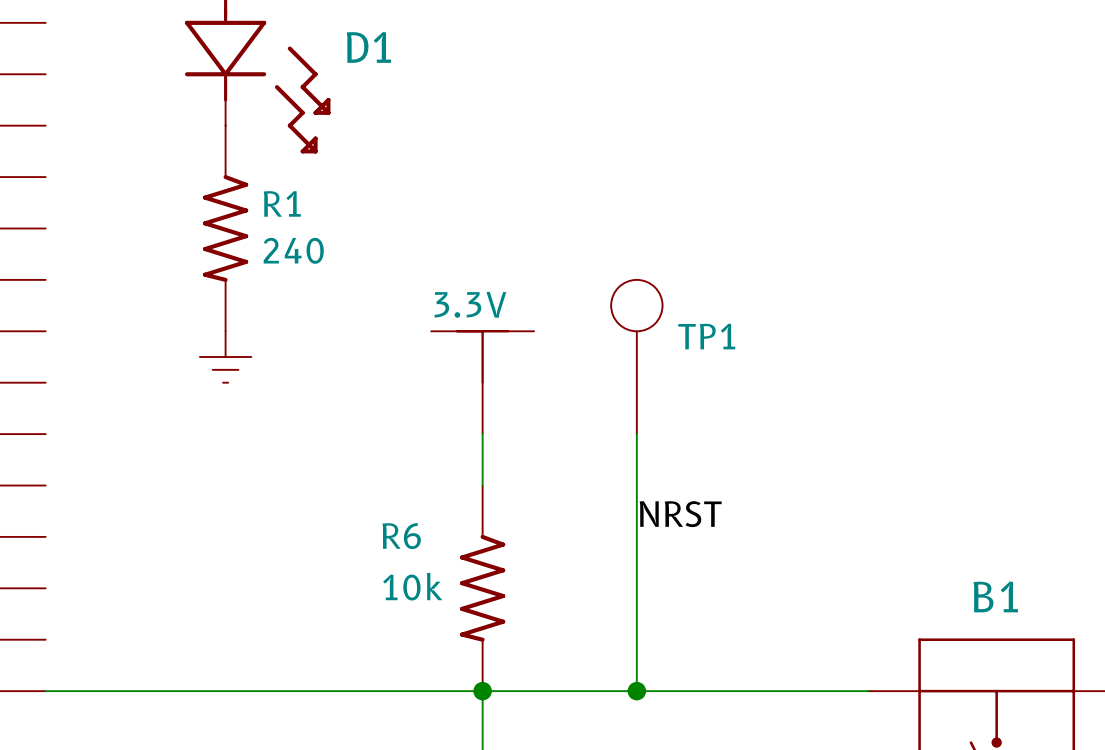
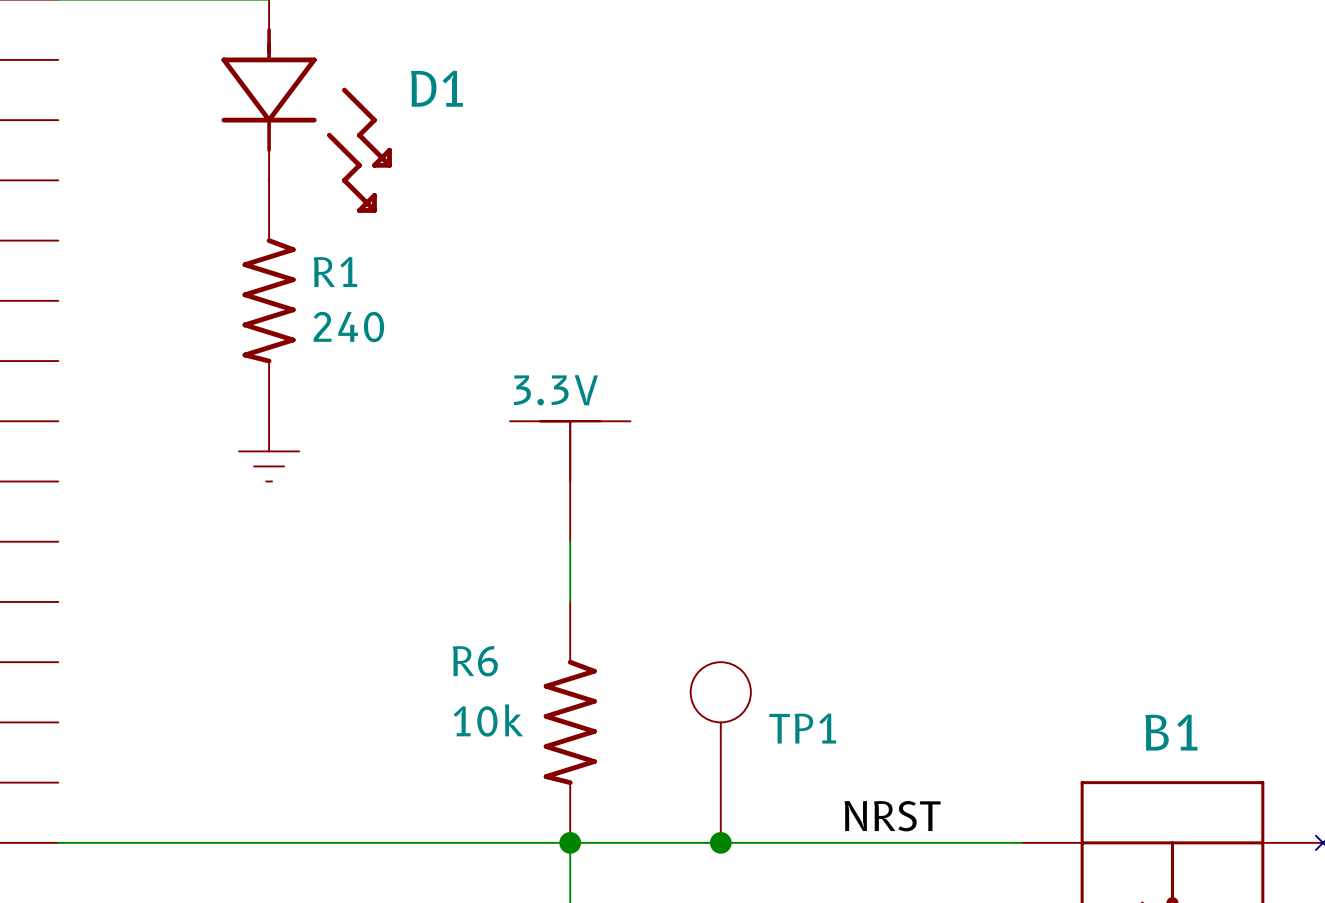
TP1 position: (636, 357) -> (720, 752)
wire: (636, 434) (636, 691) -> none
label position: NRST (680, 514) -> NRST (892, 816)
junction position: (636, 691) -> (720, 842)

